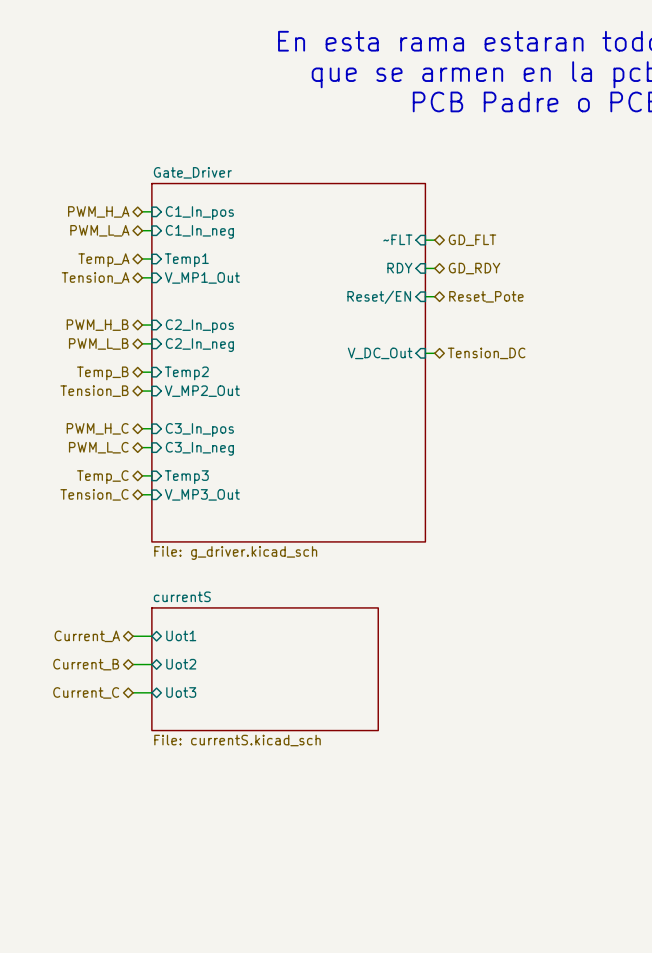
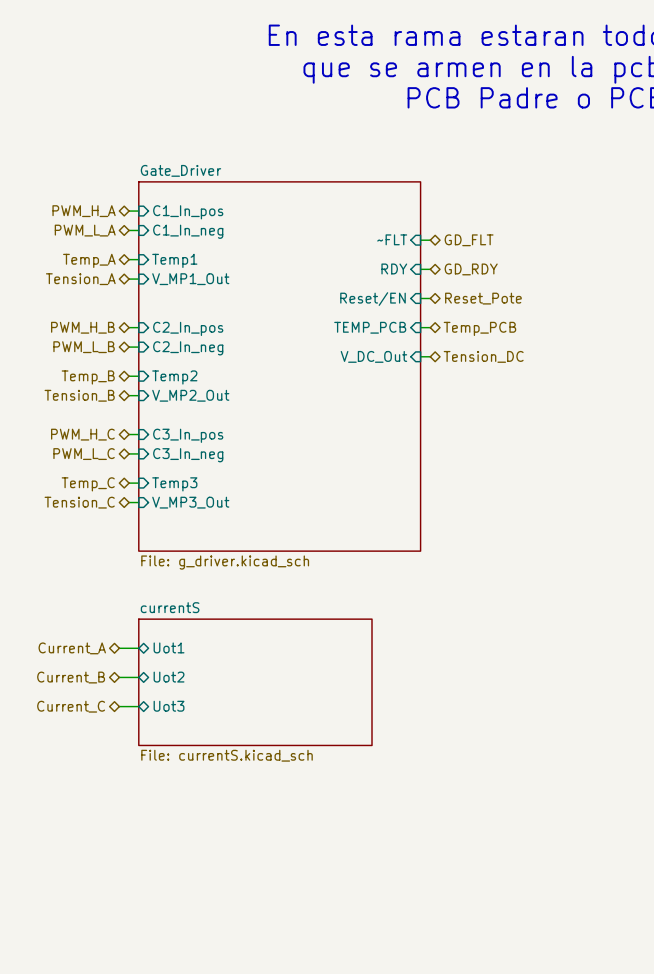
sheet pin: none -> TEMP_PCB (370, 327)
wire: none -> (420, 327) (430, 327)
hierarchical label: none -> Temp_PCB (479, 328)

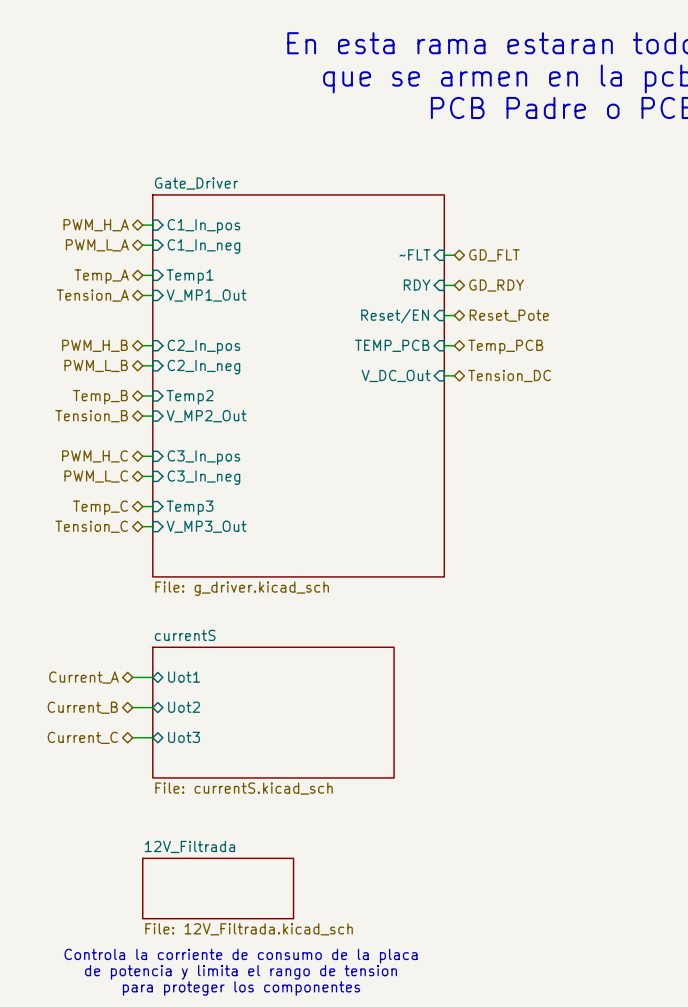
sheet 12V_Filtrada: none -> File: 12V_Filtrada.kicad_sch (218, 888)
text: none -> Controla la corriente de consumo de la placa (241, 956)
text: none -> de potencia y limita el rango de tension (241, 972)
text: none -> para proteger los componentes (241, 988)

